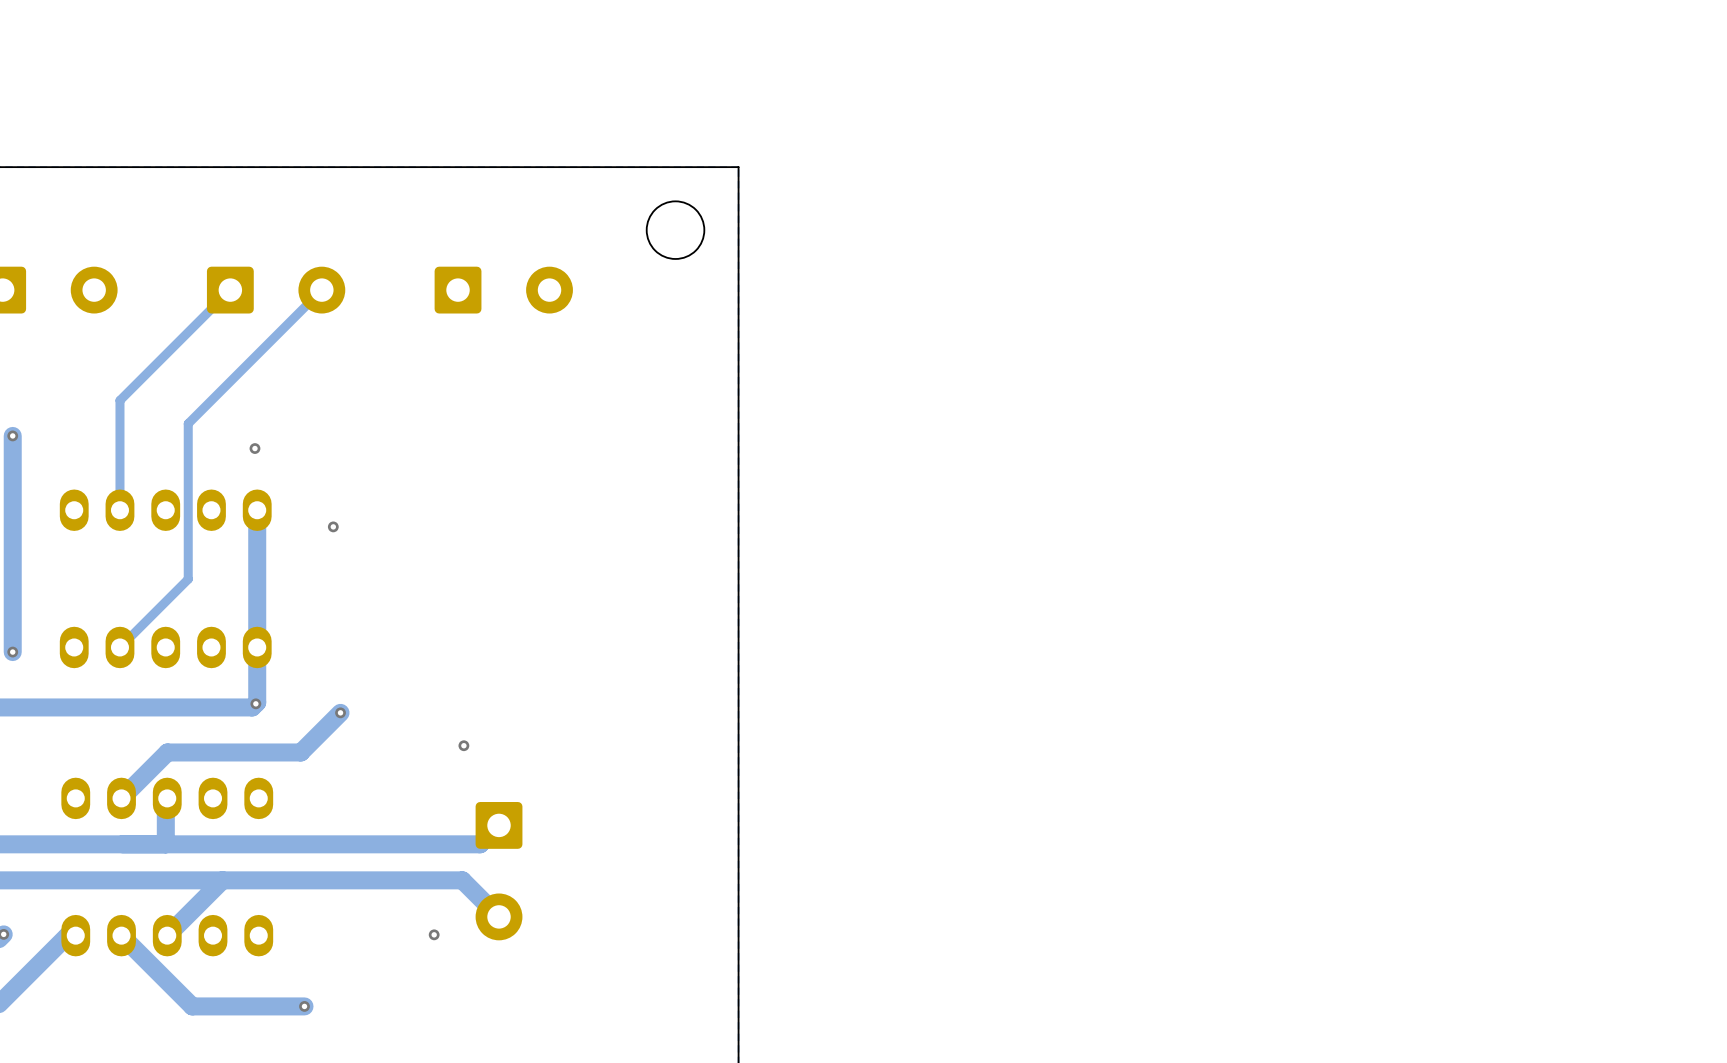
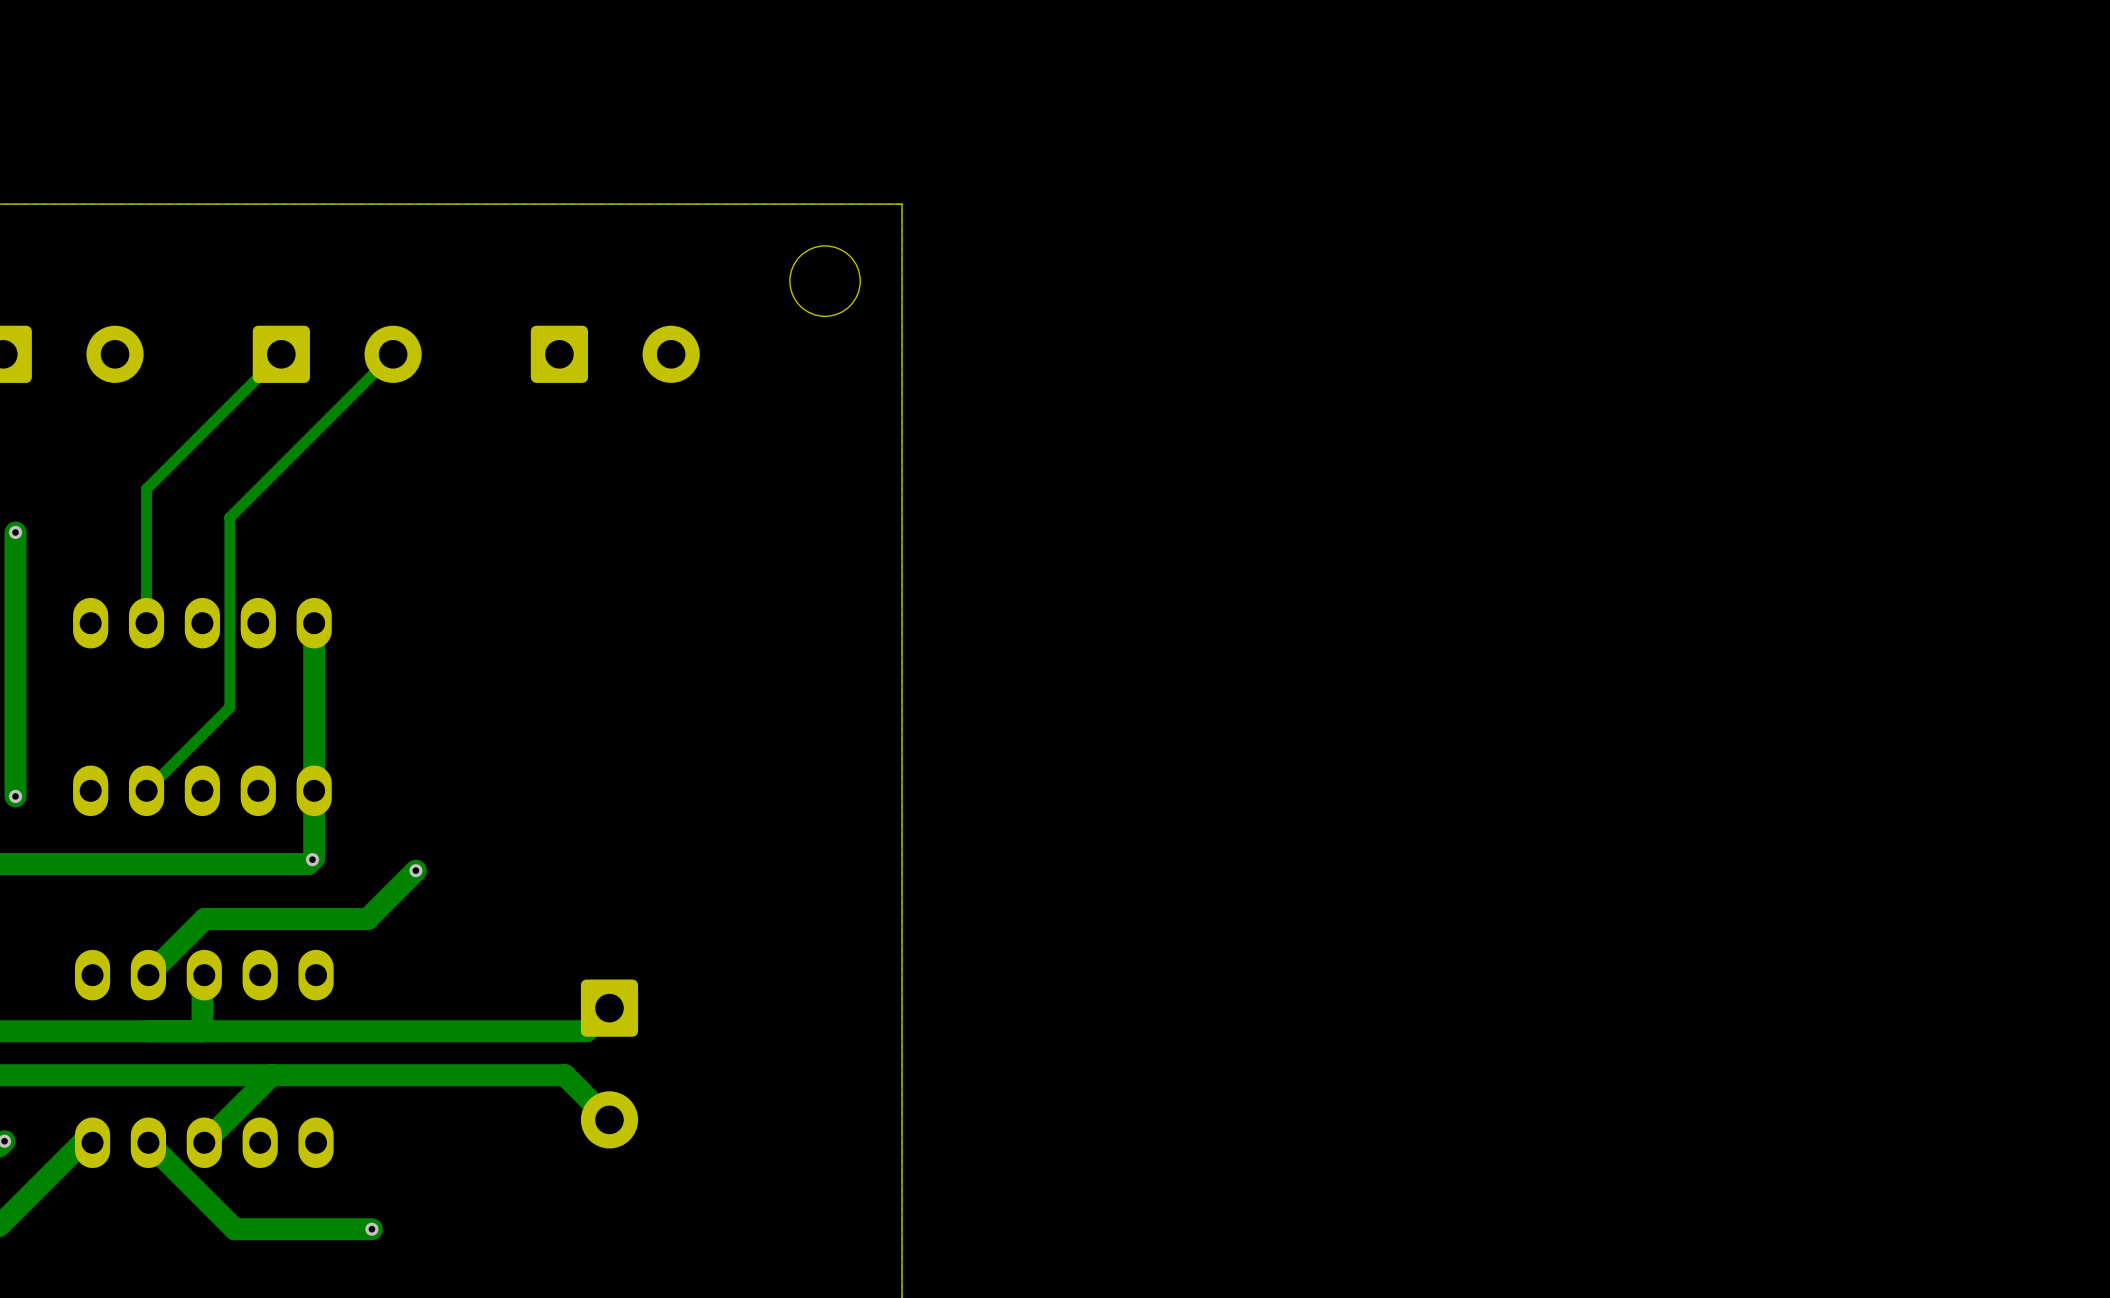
via: (254, 448) -> none
via: (333, 526) -> none
via: (463, 745) -> none
via: (434, 934) -> none

